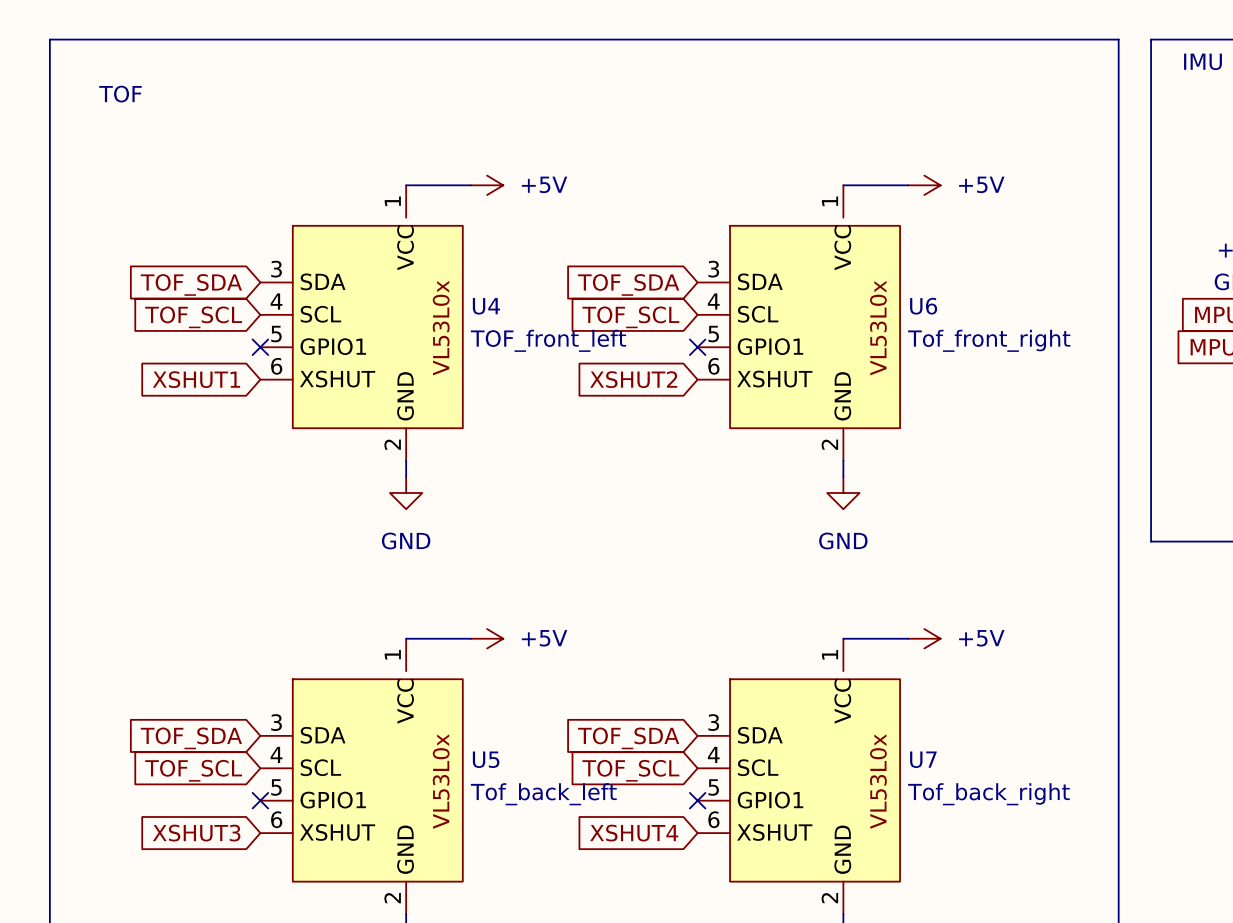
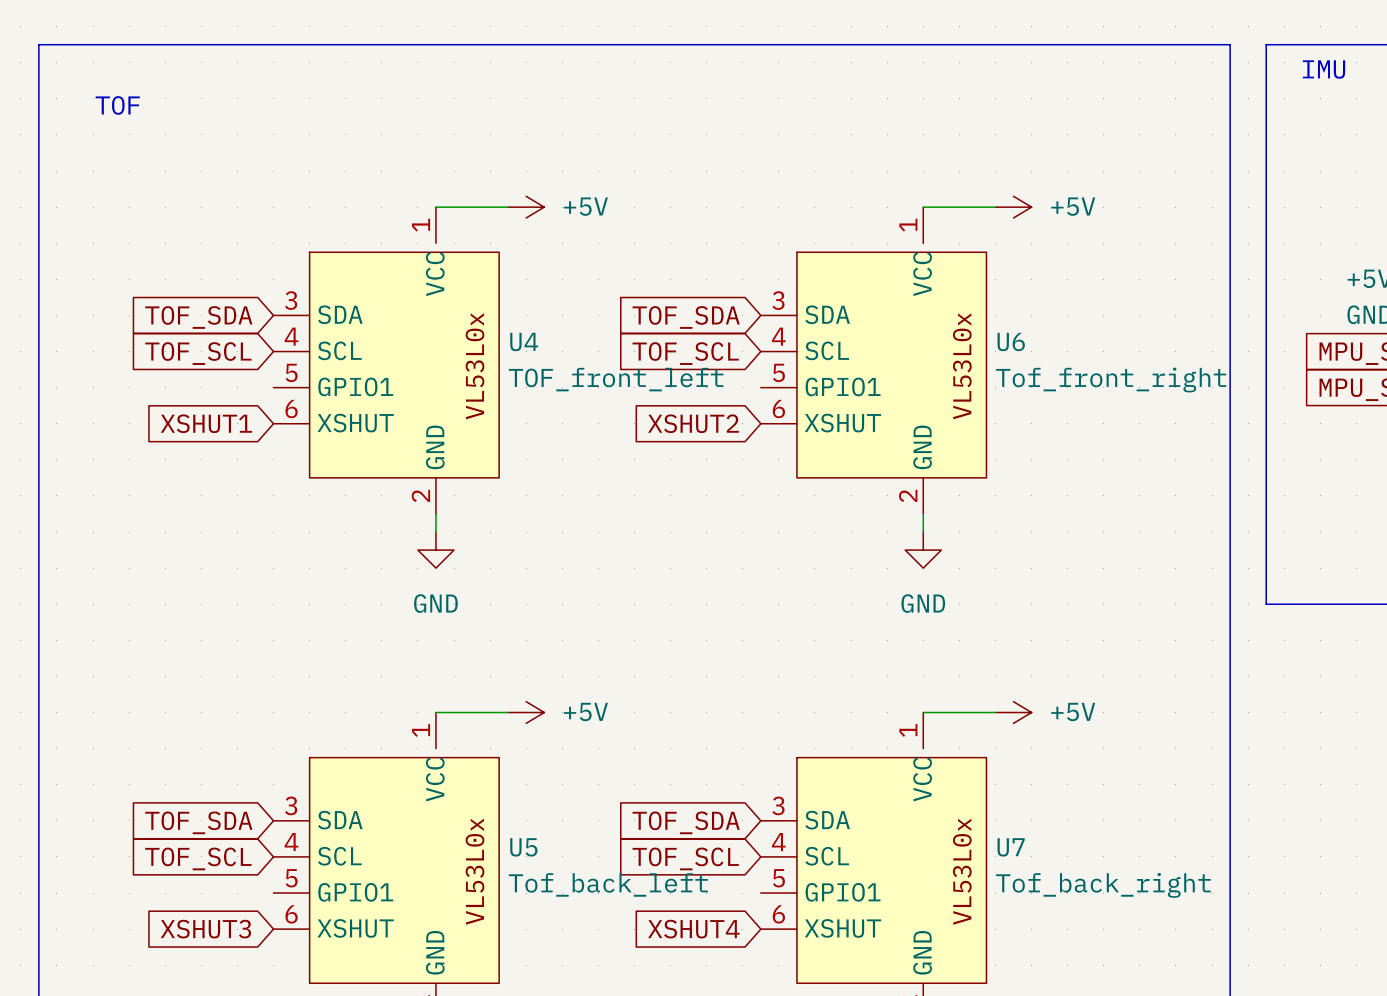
no-connect mark: (260, 347) -> none
no-connect mark: (697, 347) -> none
no-connect mark: (260, 800) -> none
no-connect mark: (697, 800) -> none

